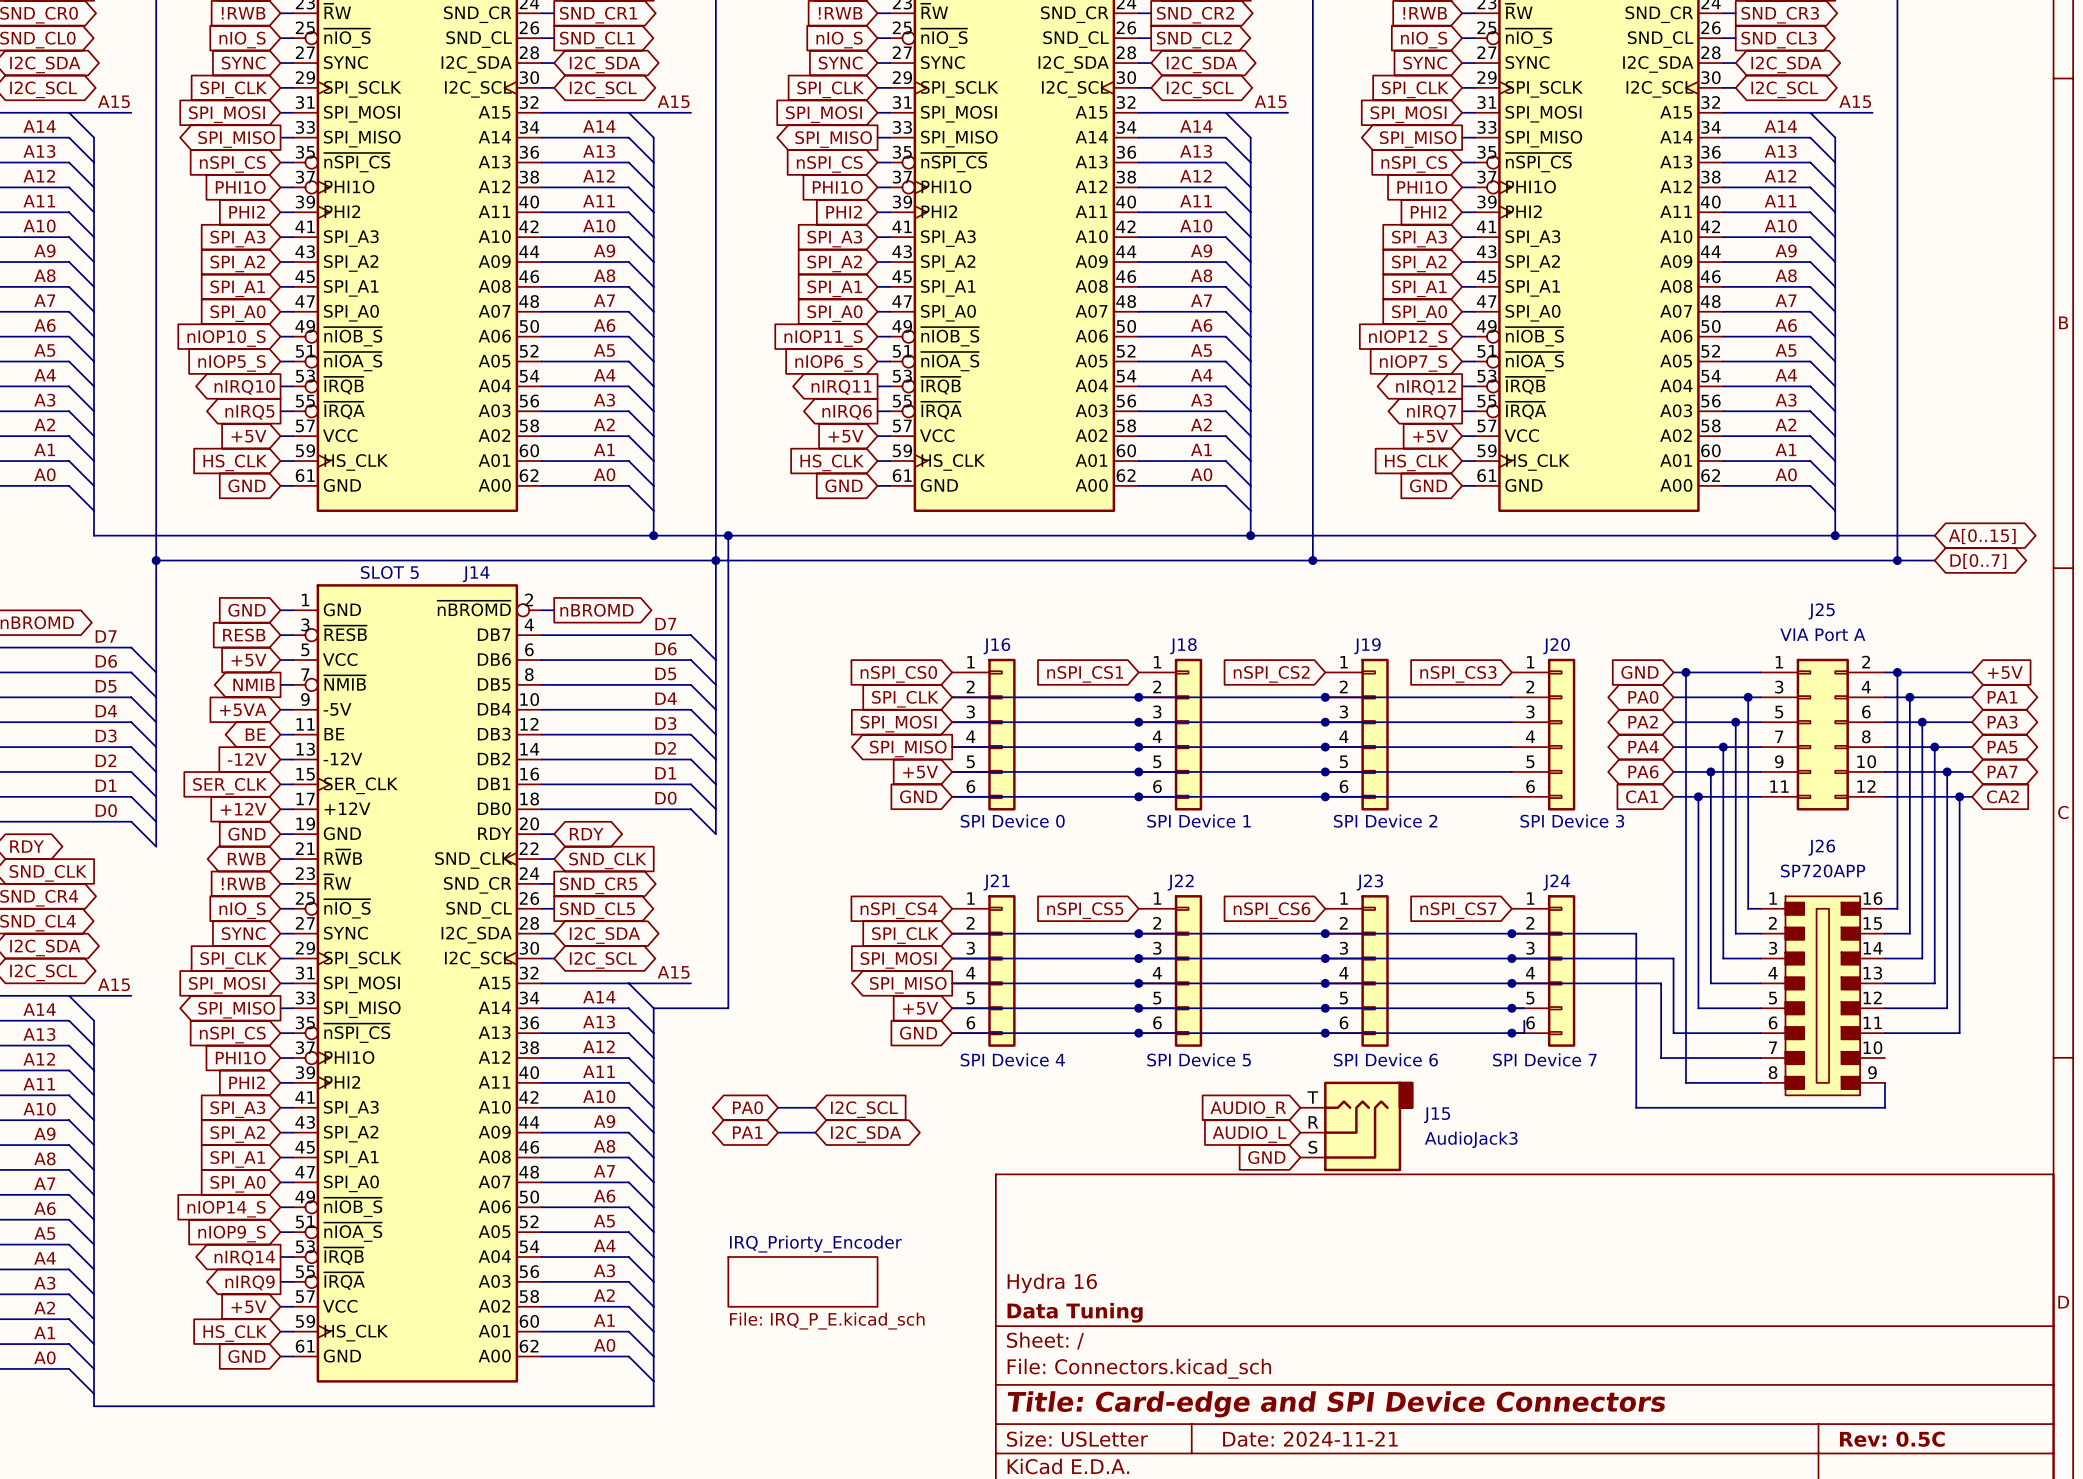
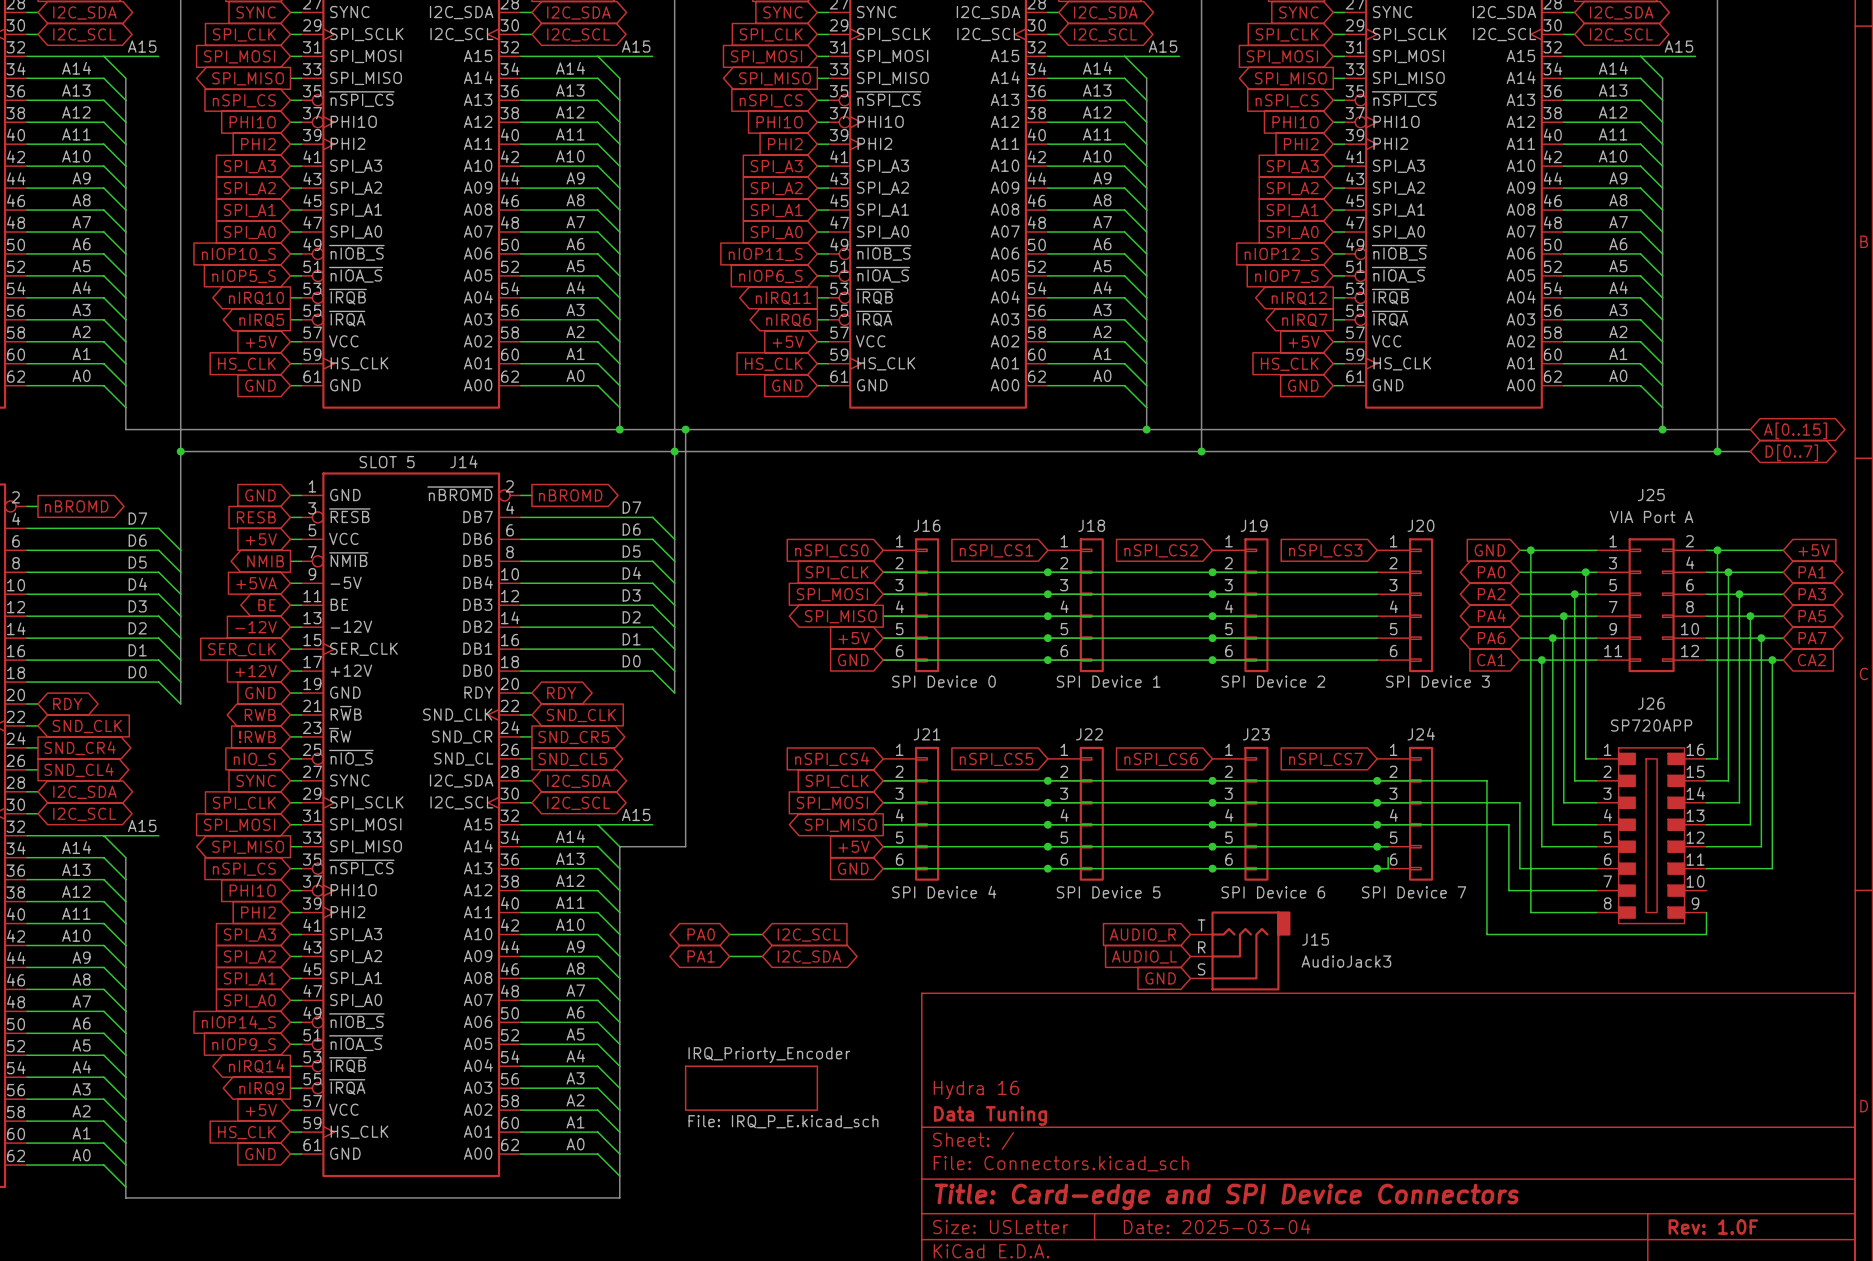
title block: Date: 2024-11-21 (1310, 1439) -> Date: 2025-03-04 (1217, 1226)
title block: Rev: 0.5C (1892, 1439) -> Rev: 1.0F (1713, 1227)

